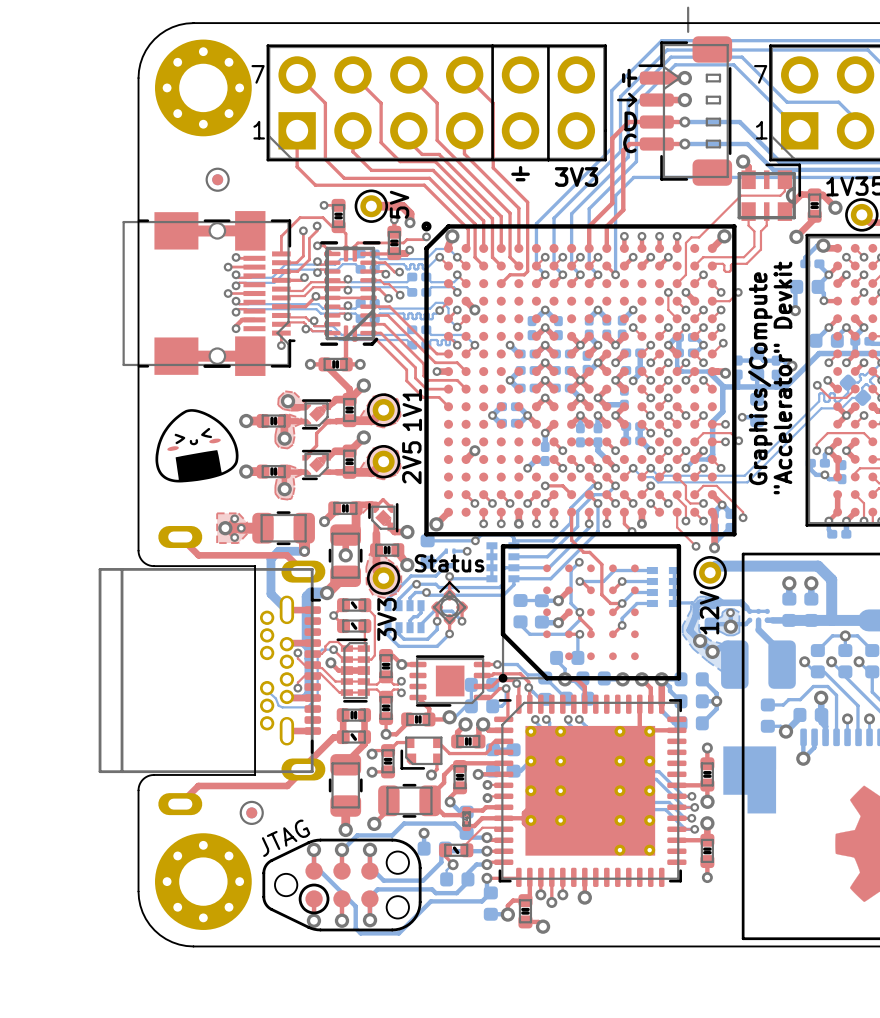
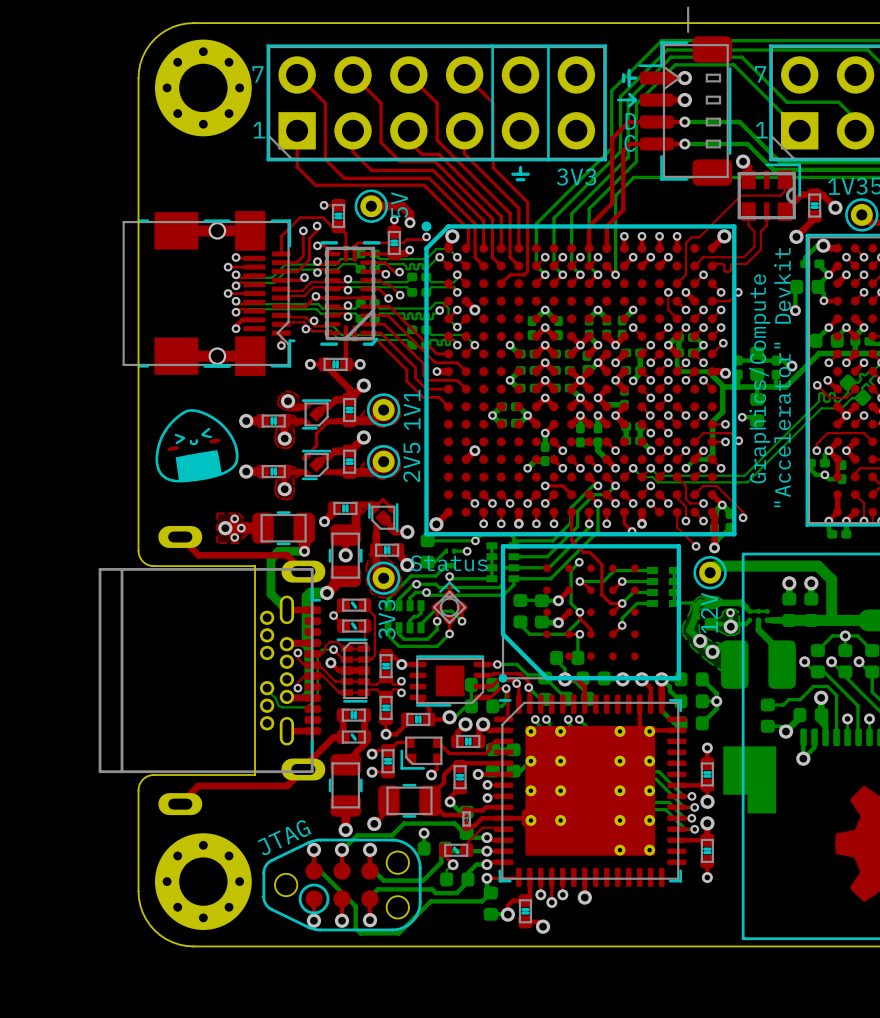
part: (217, 179) -> none
part: (251, 812) -> none

